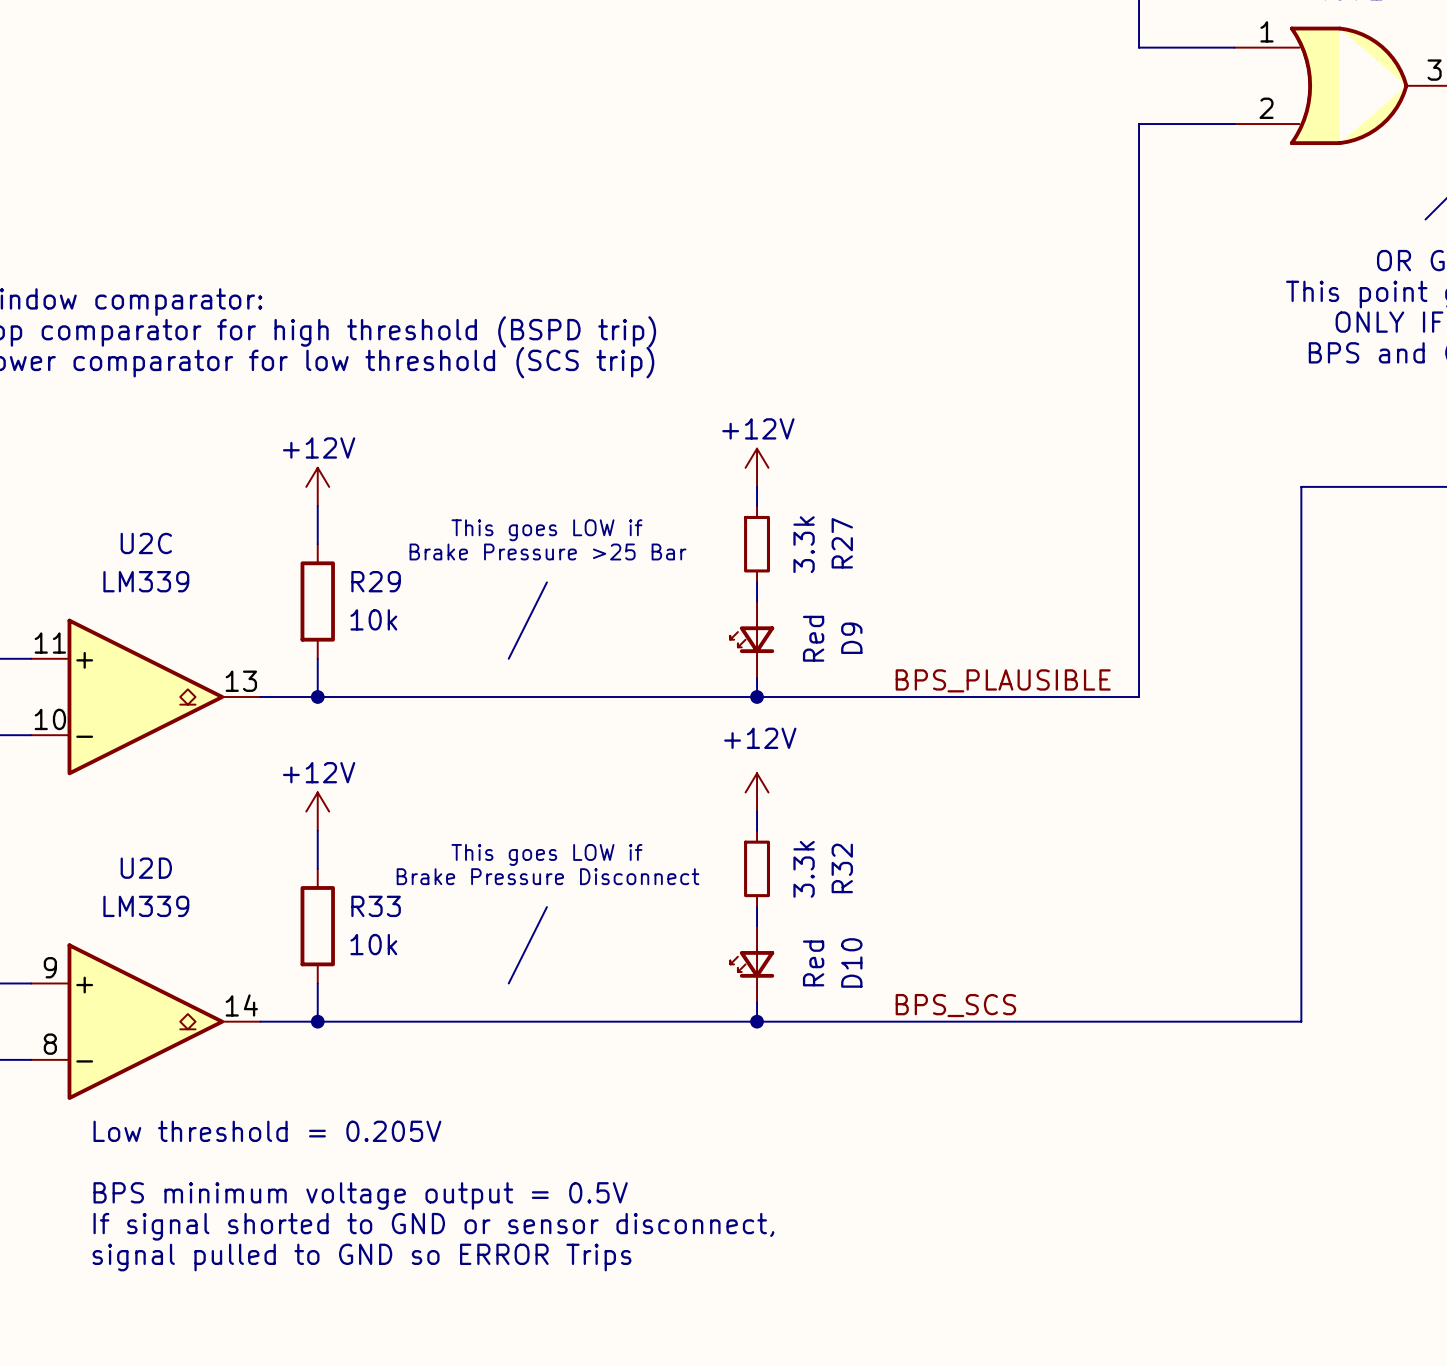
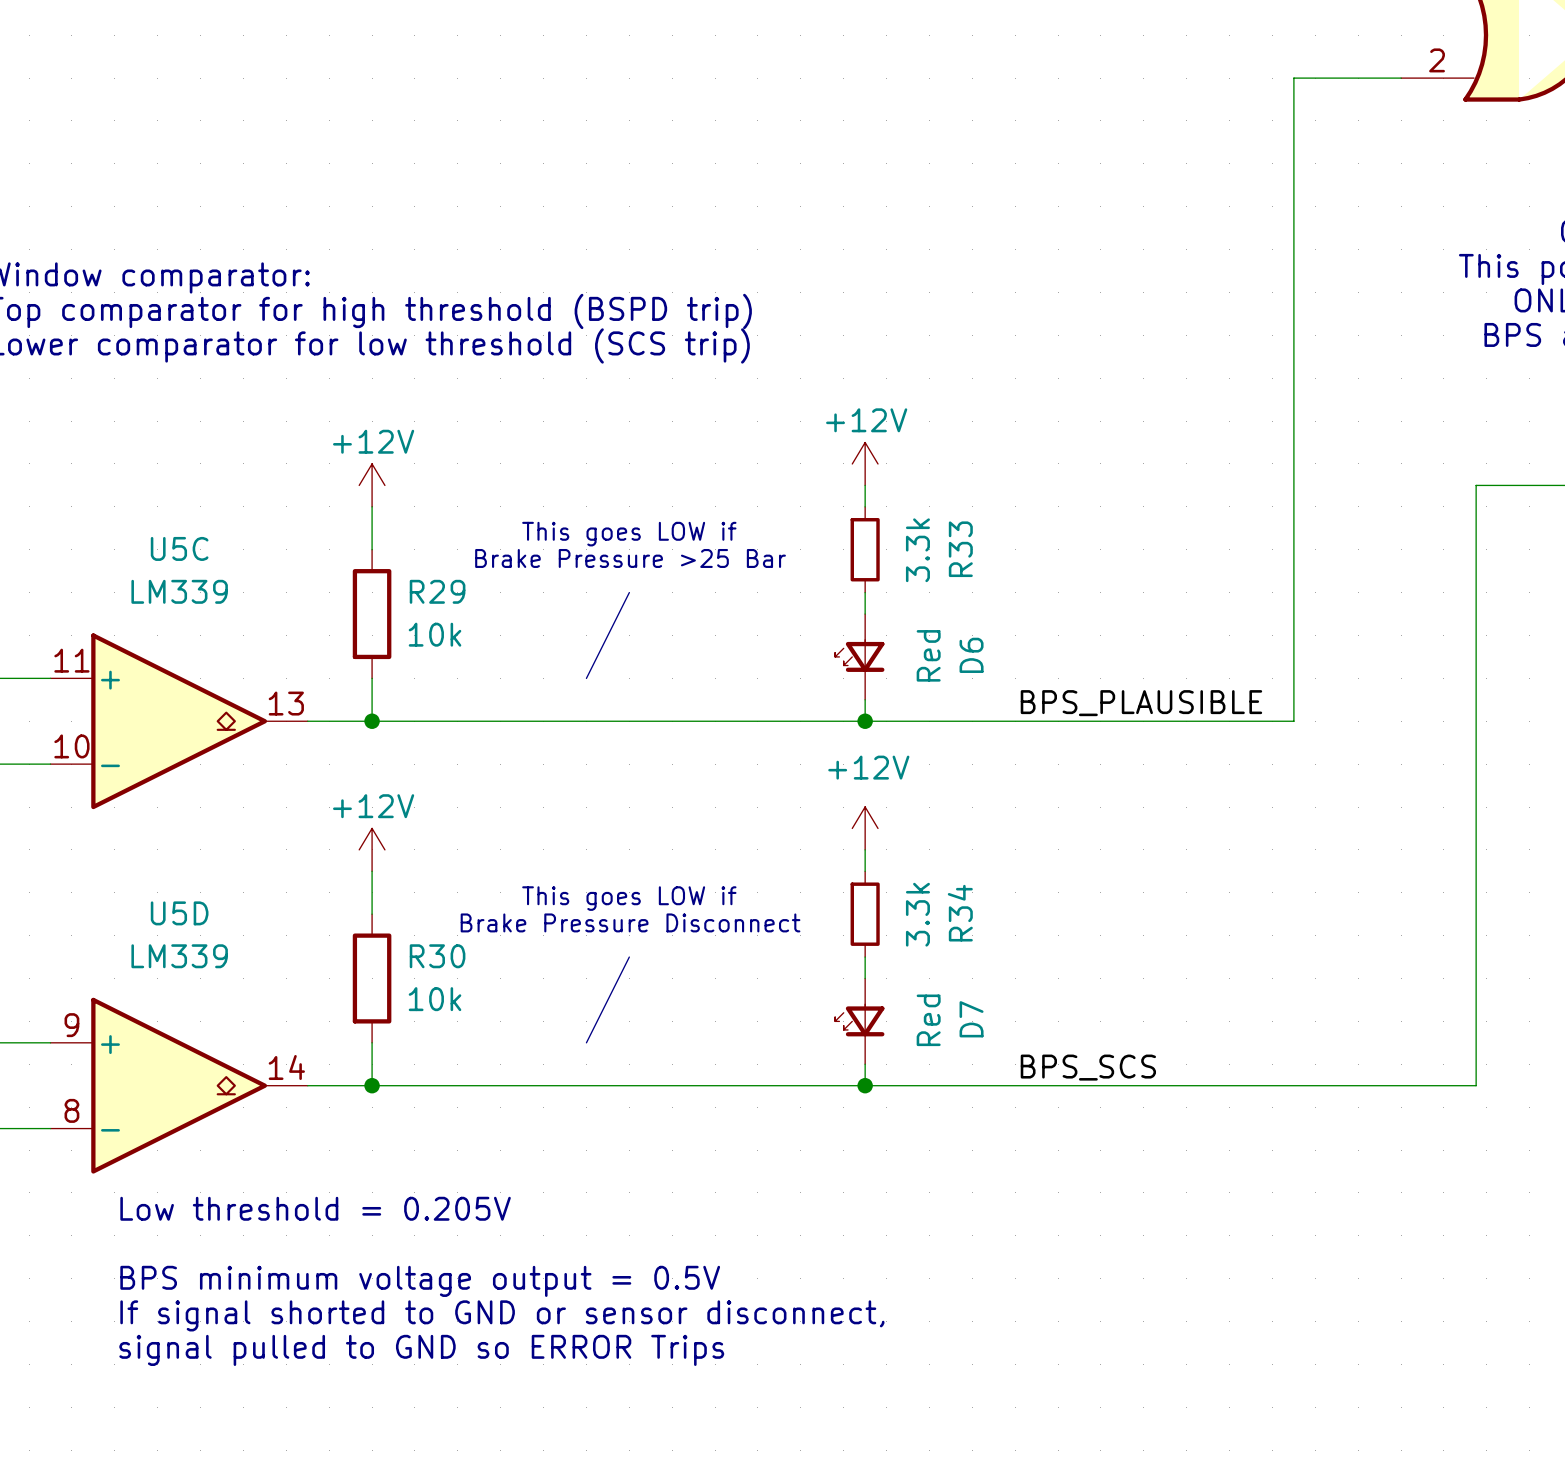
U2C name: U2C (146, 543) -> U5C (179, 548)
R27 name: R27 (842, 543) -> R33 (960, 549)
D9 name: D9 (851, 638) -> D6 (971, 655)
U2D name: U2D (146, 868) -> U5D (179, 913)
R32 name: R32 (842, 868) -> R34 (960, 913)
R33 name: R33 (376, 906) -> R30 (437, 956)
D10 name: D10 (851, 962) -> D7 (971, 1019)

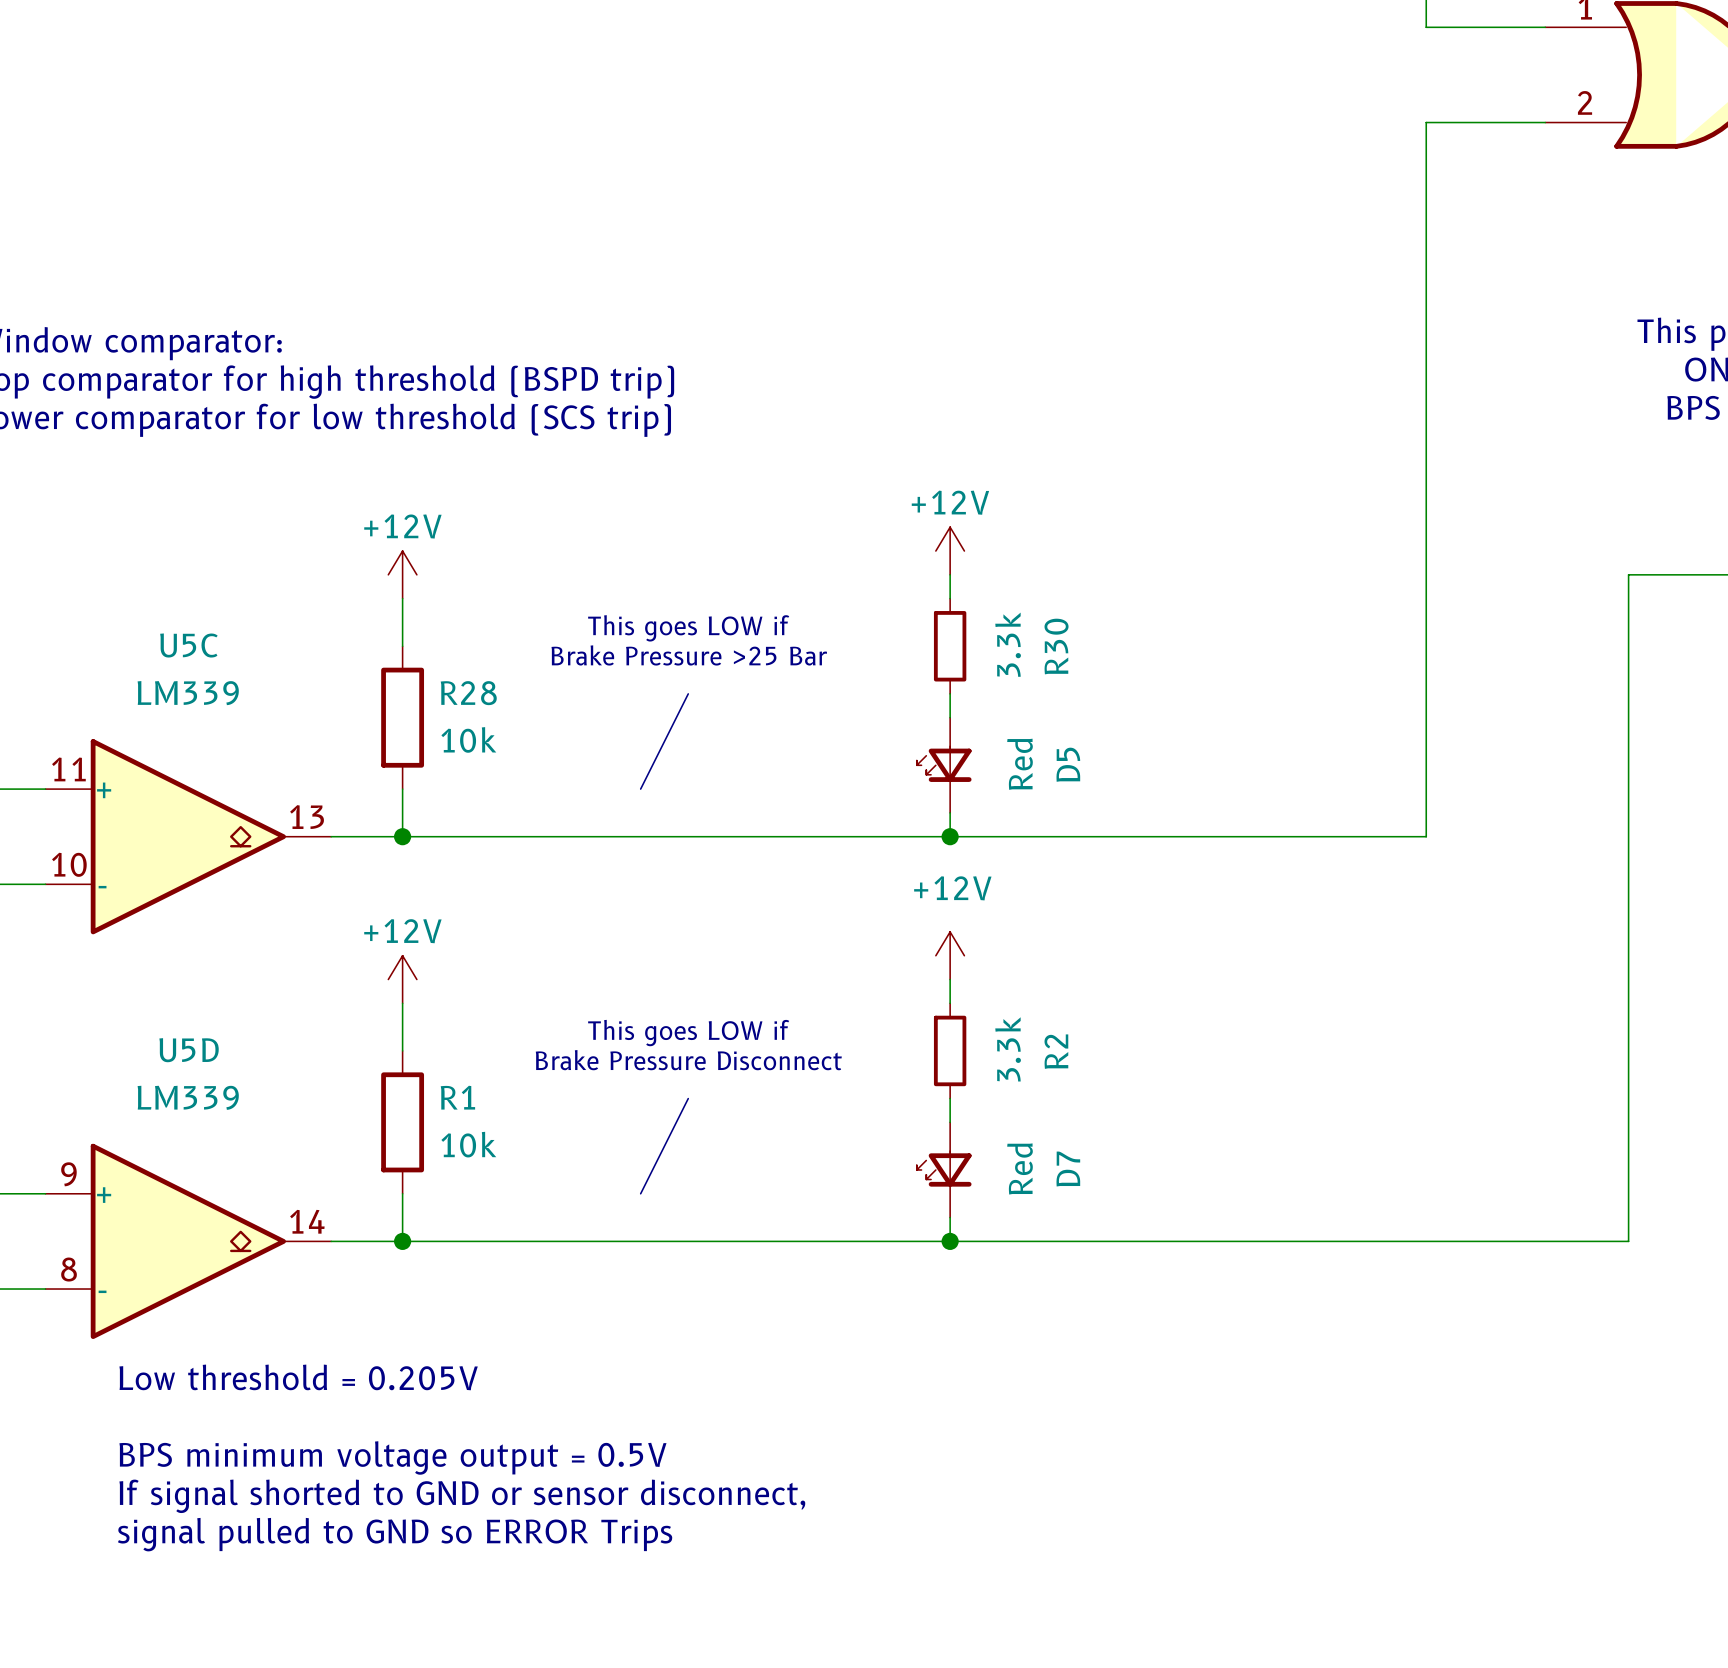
R33 name: R33 (960, 549) -> R30 (1056, 646)
R29 name: R29 (437, 591) -> R28 (468, 693)
D6 name: D6 (971, 655) -> D5 (1068, 764)
label: BPS_PLAUSIBLE (1141, 703) -> none
R34 name: R34 (960, 913) -> R2 (1056, 1051)
R30 name: R30 (437, 956) -> R1 (457, 1097)
label: BPS_SCS (1088, 1067) -> none

